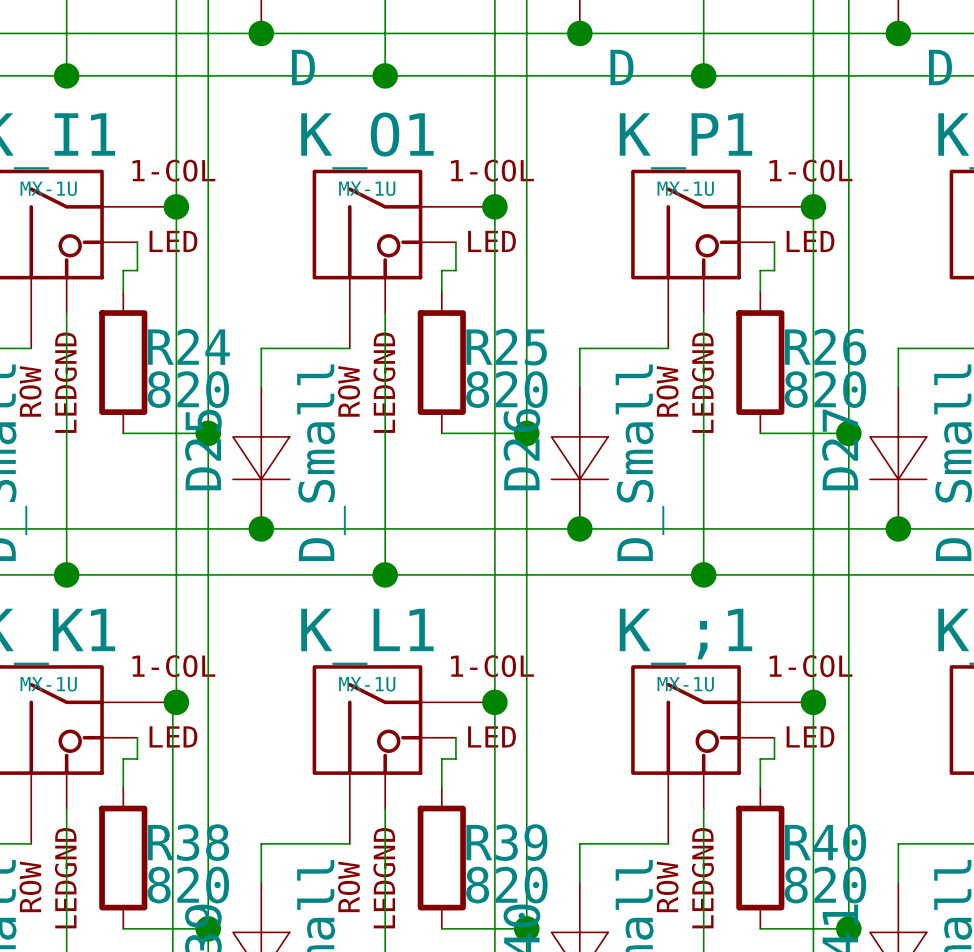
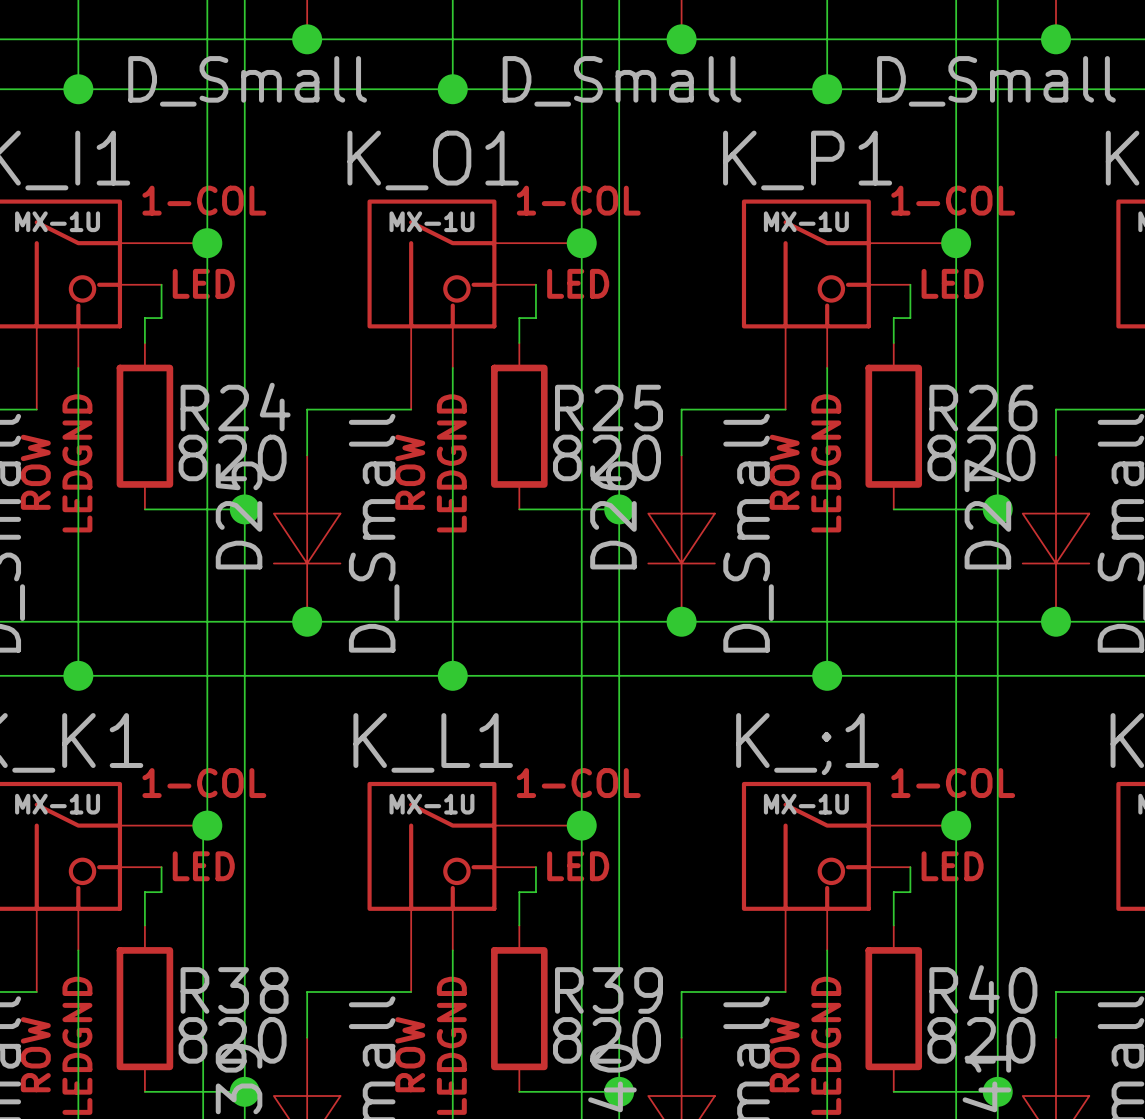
part value: D (303, 67) -> D_Small (247, 81)
part value: D (621, 67) -> D_Small (622, 81)
part value: D (940, 67) -> D_Small (996, 81)

